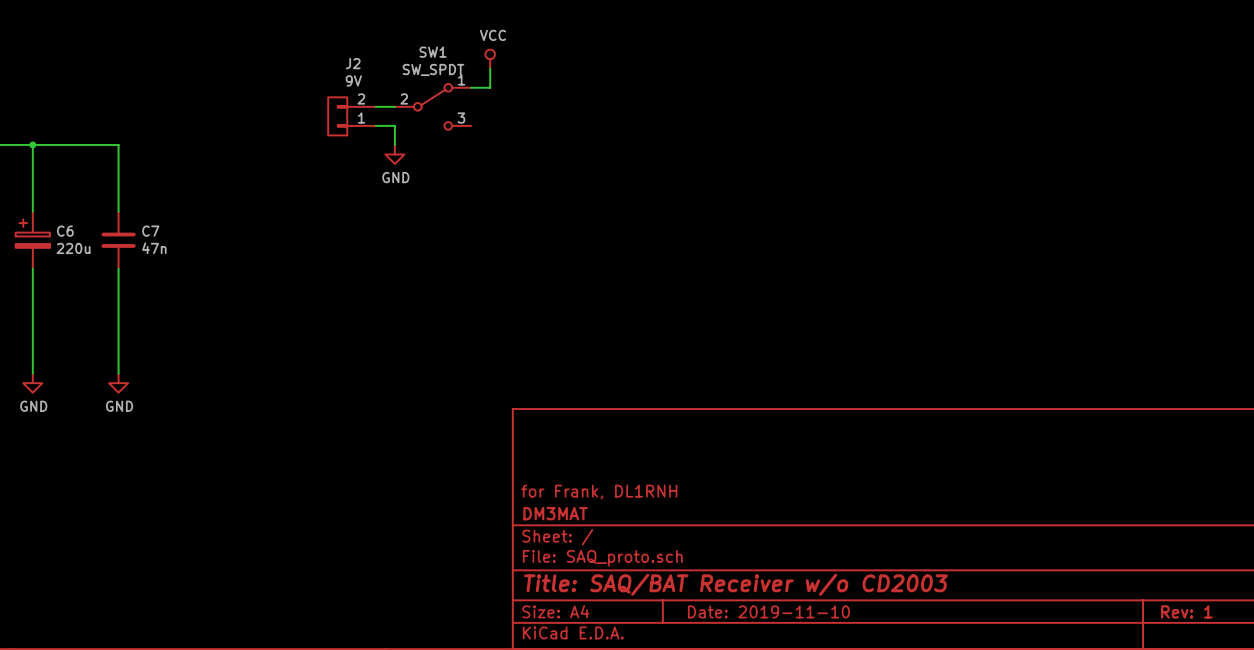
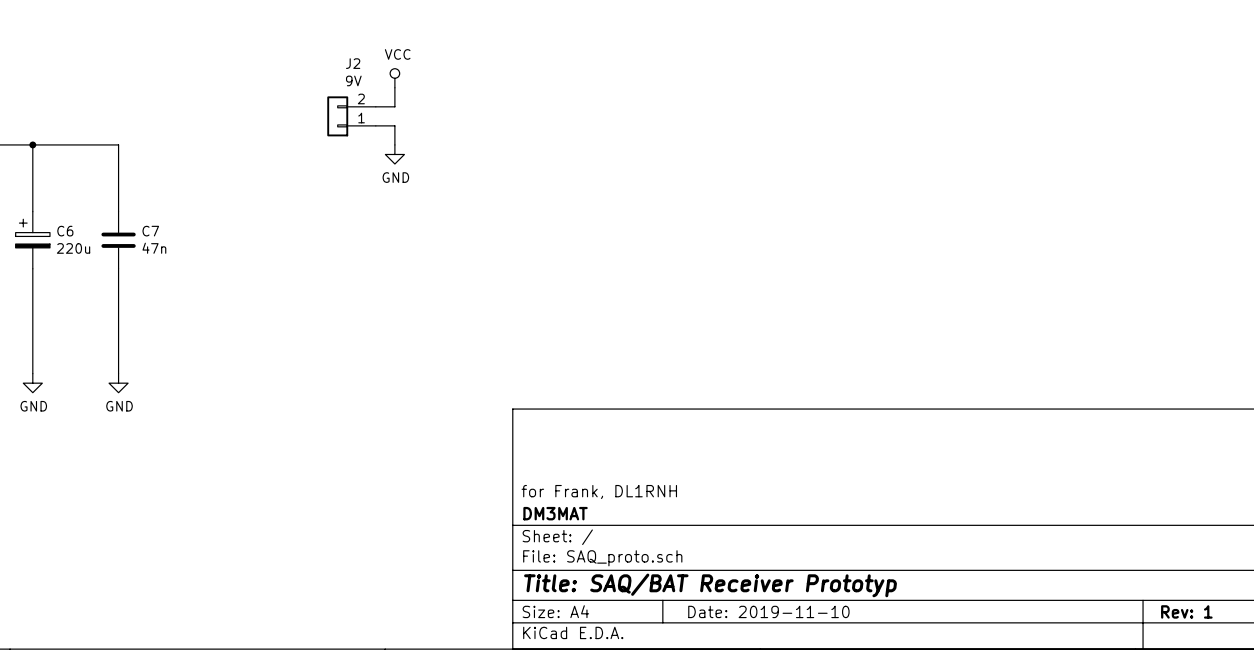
power symbol position: VCC (490, 59) -> VCC (394, 78)
wire: (490, 68) (490, 87) (471, 87) -> none
wire: none -> (394, 87) (394, 106)
SW1: SW_SPDT (433, 106) -> none
title block: Title: SAQ/BAT Receiver w/o CD2003 (736, 584) -> Title: SAQ/BAT Receiver Prototyp (710, 585)

